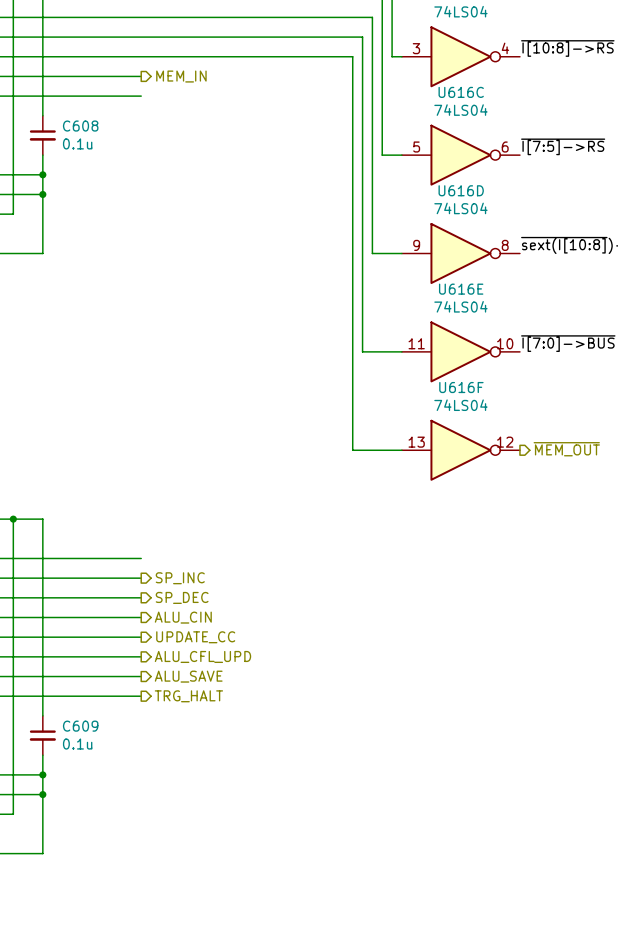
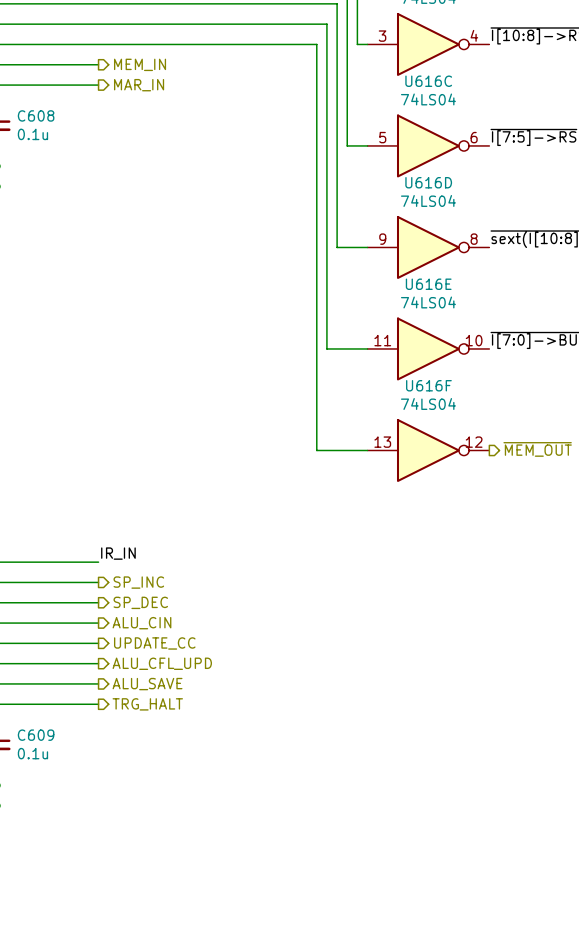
hierarchical label: none -> MAR_IN (139, 85)
label: none -> IR_IN (118, 553)

